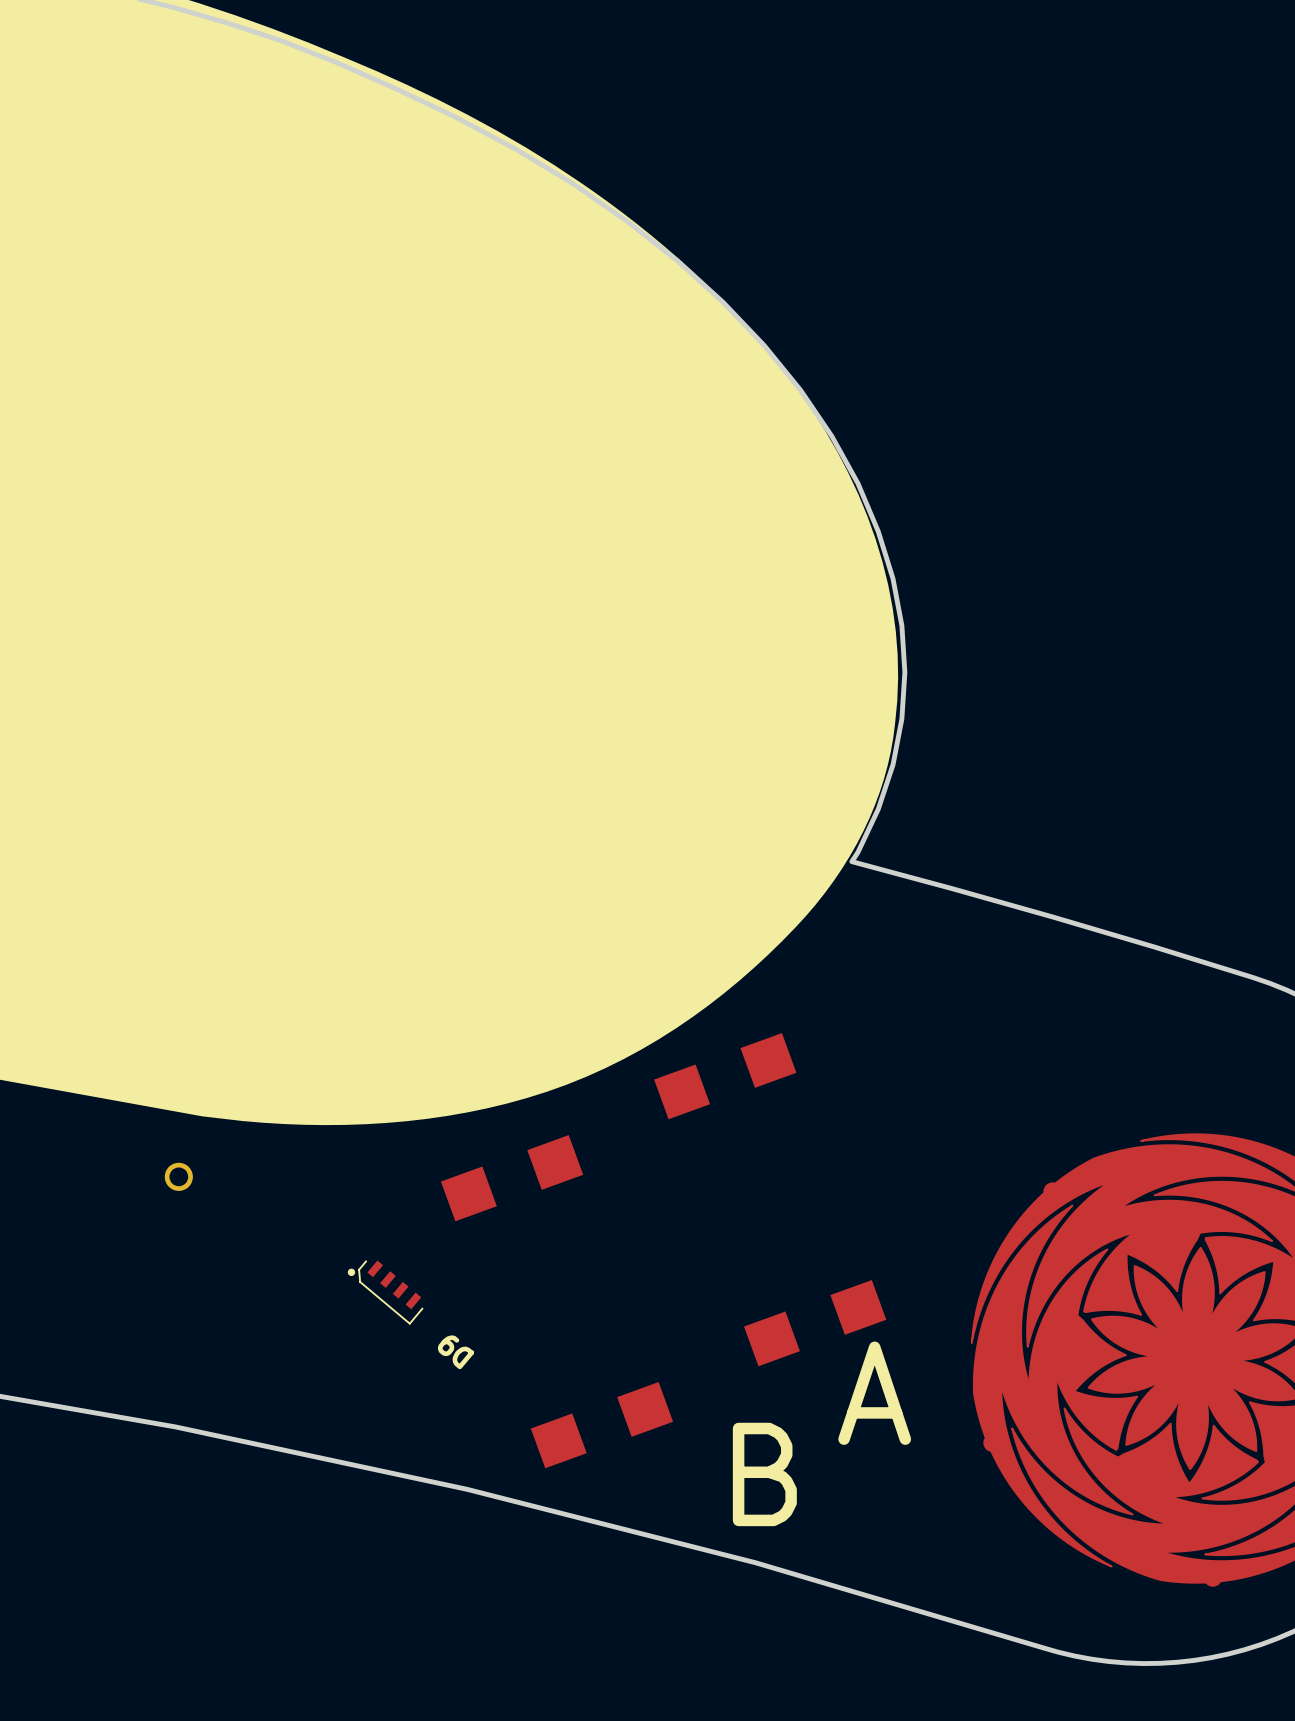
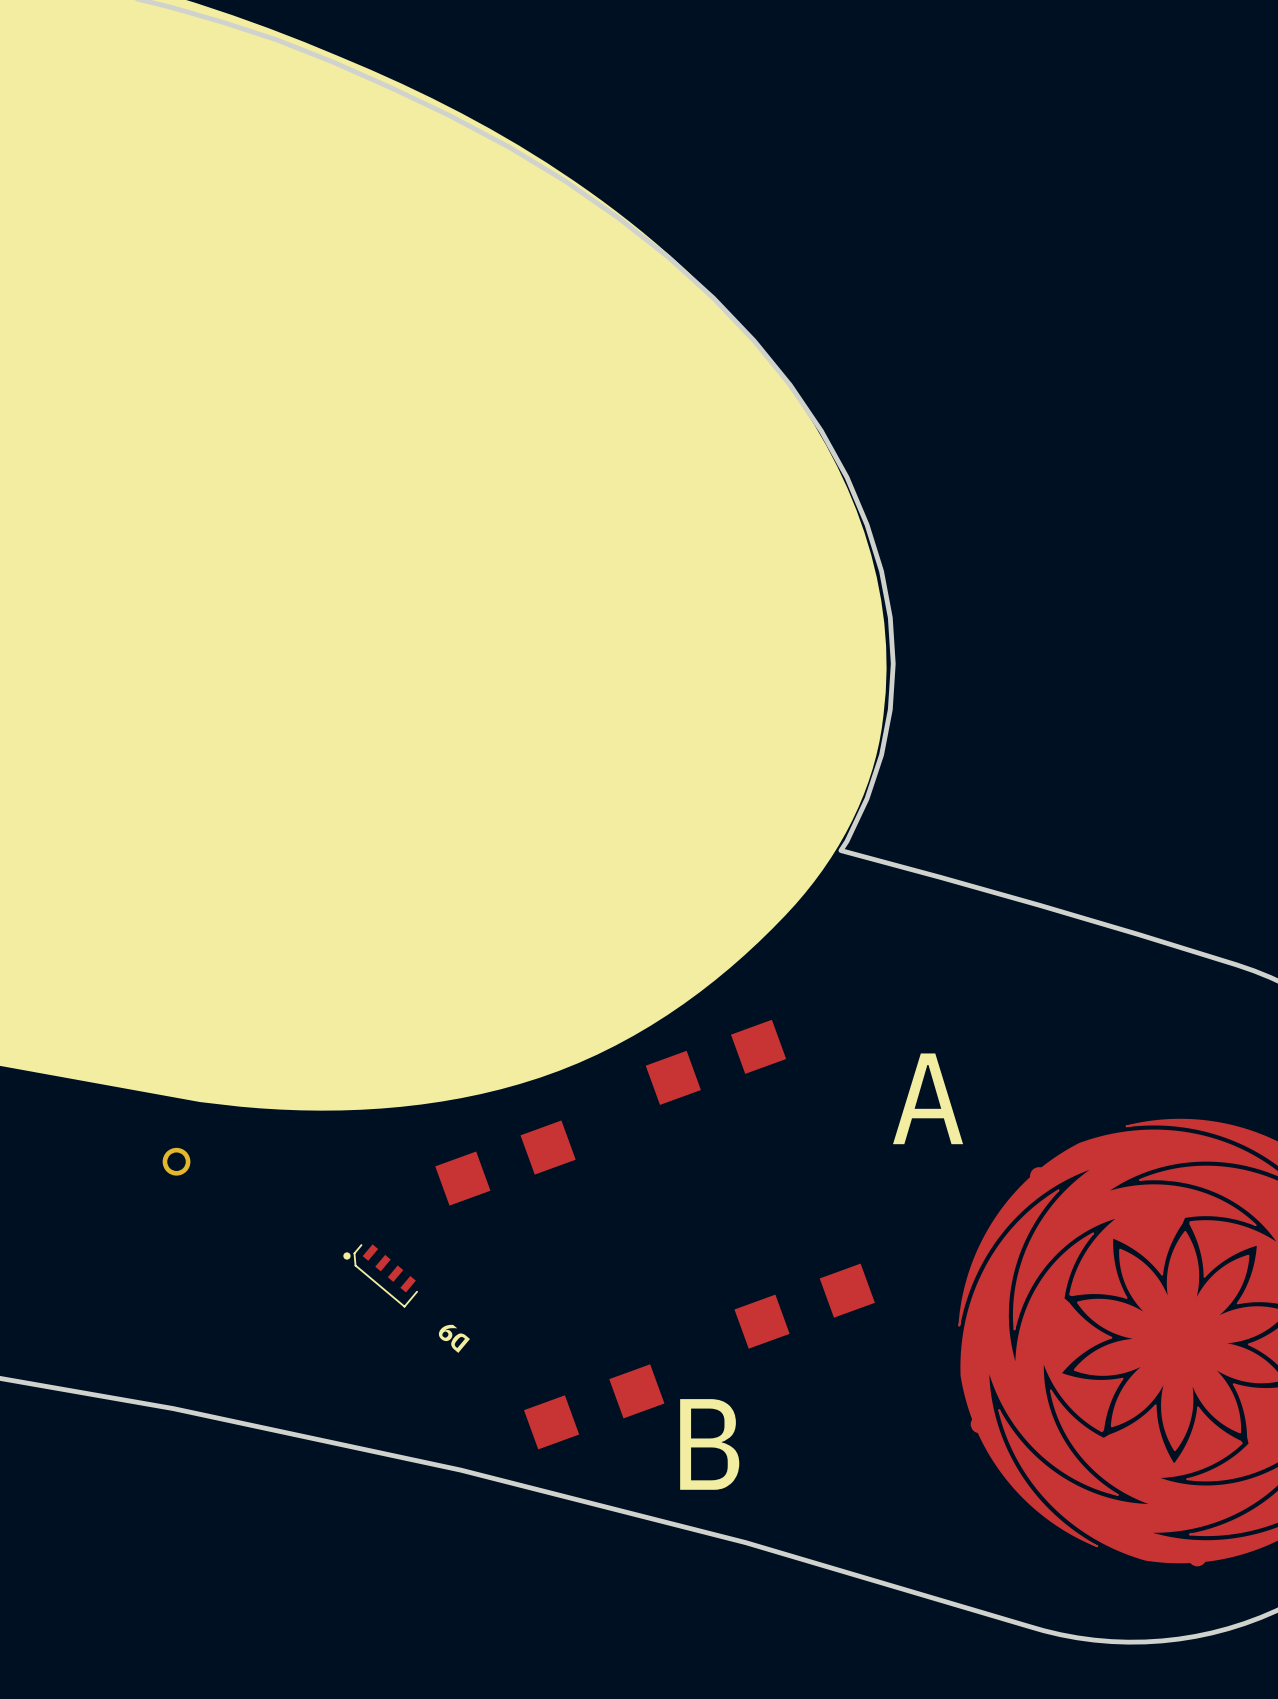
text position: A (874, 1393) -> A (928, 1098)
text position: B (764, 1474) -> B (709, 1444)

